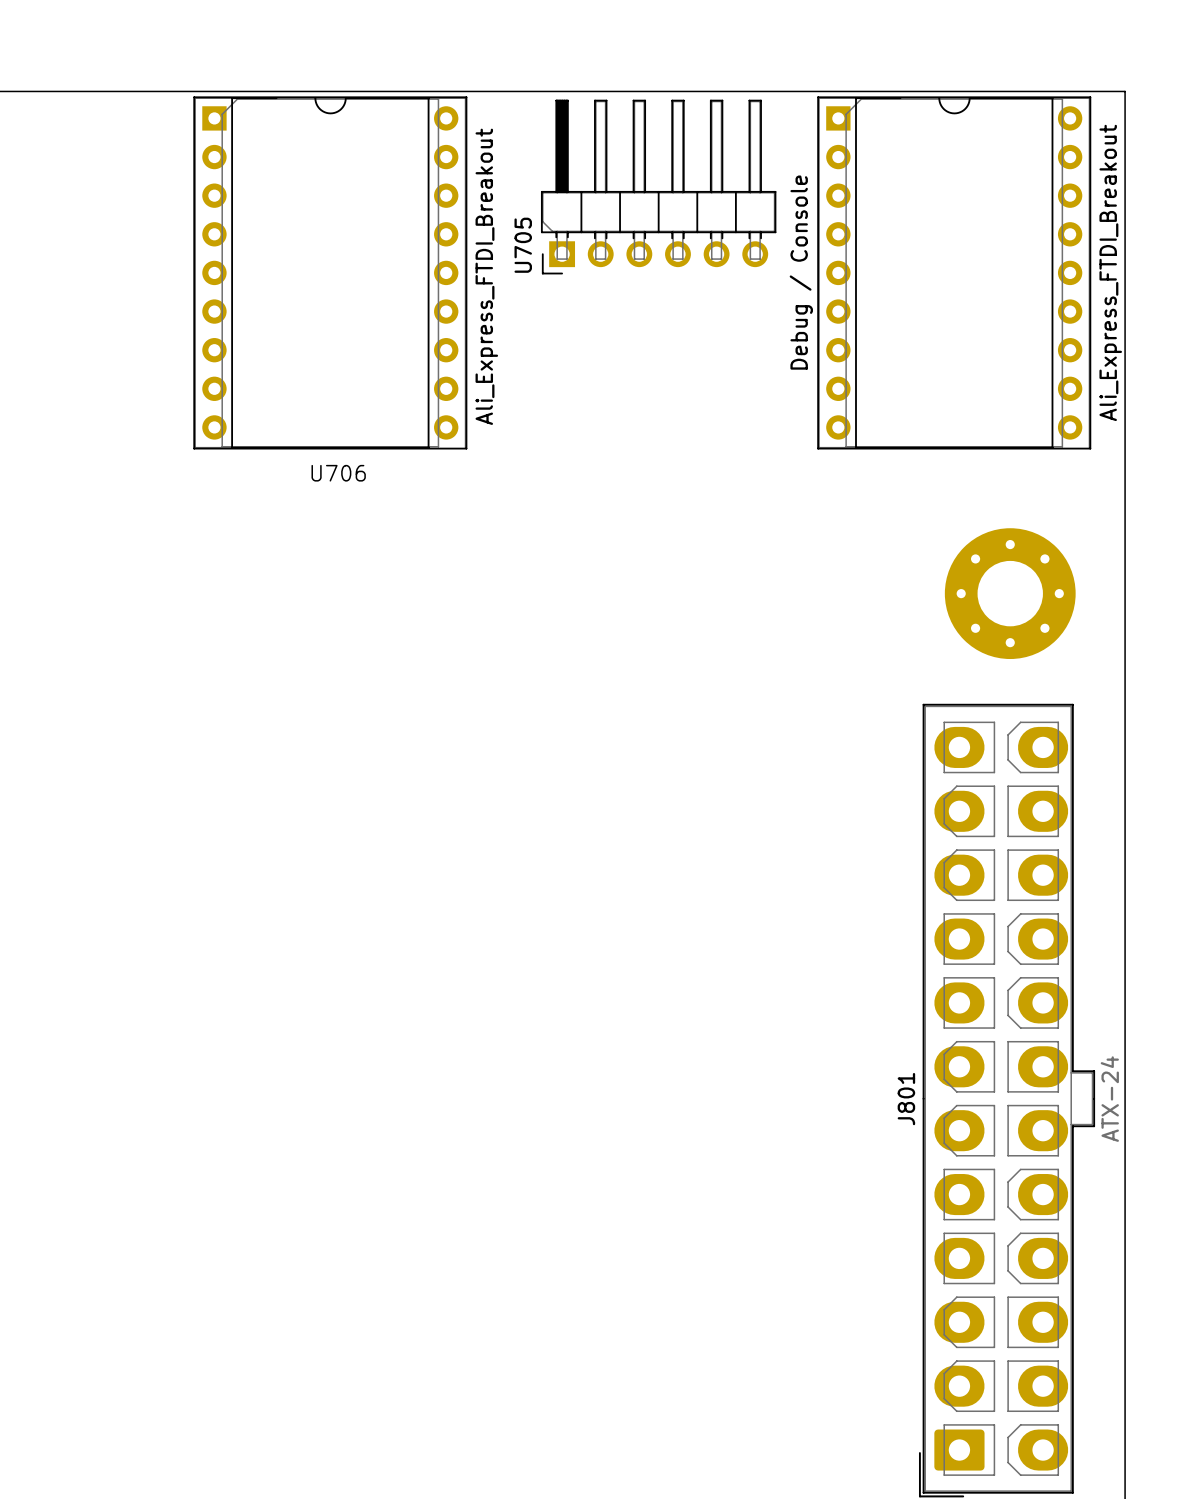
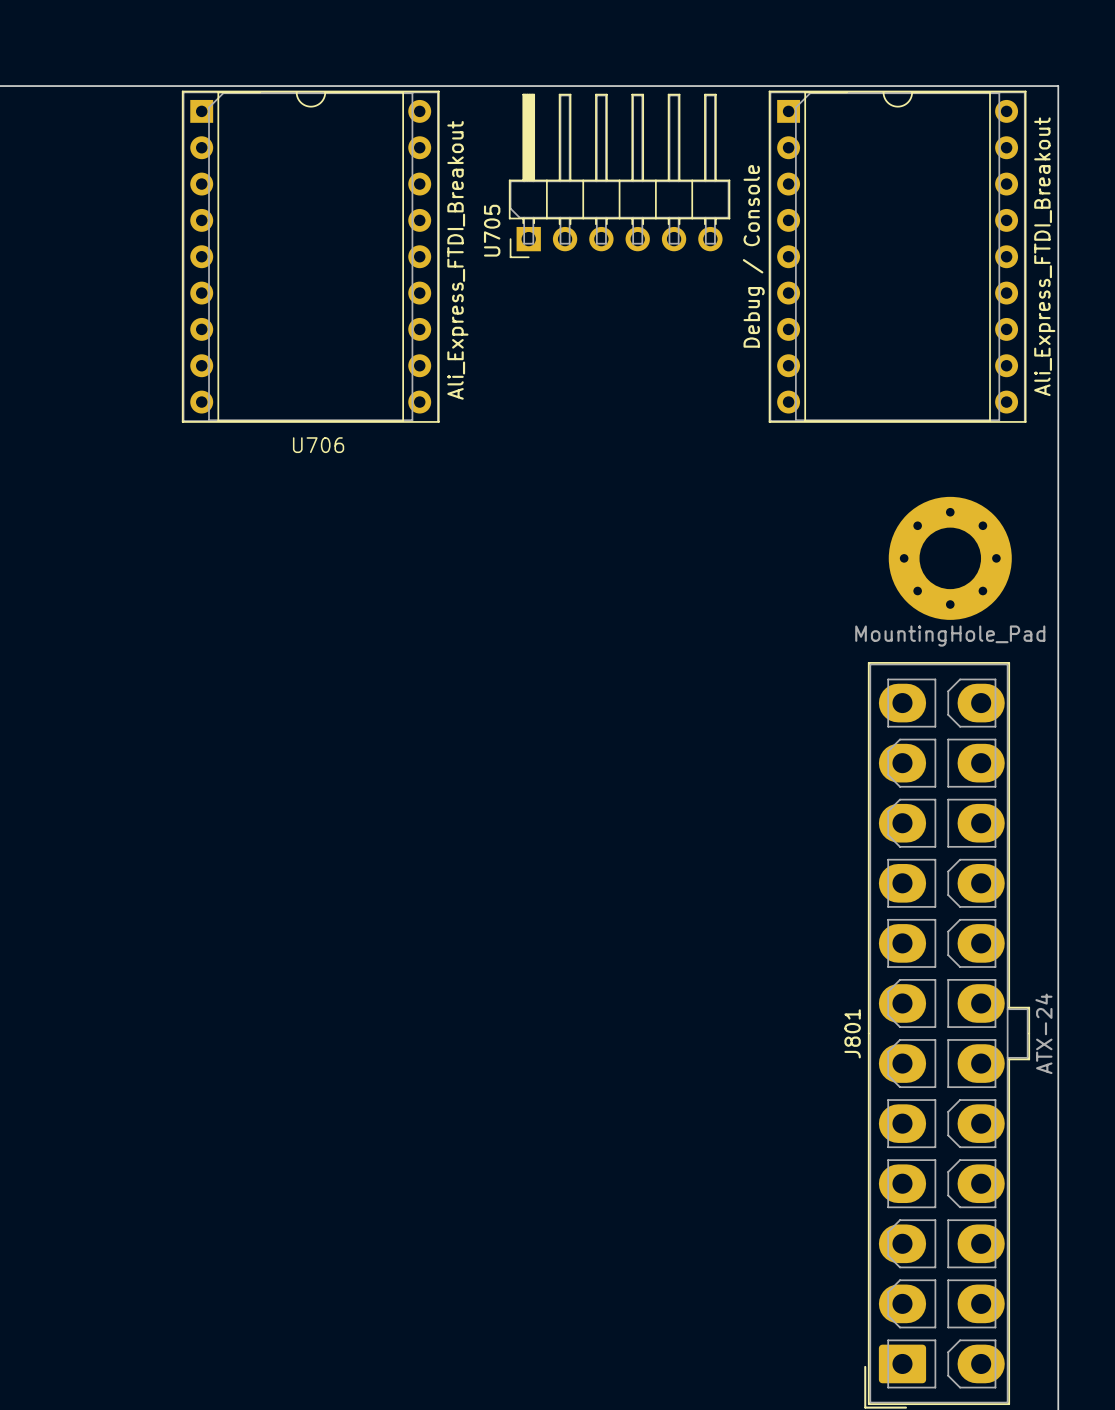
part value: none -> MountingHole_Pad (950, 636)

